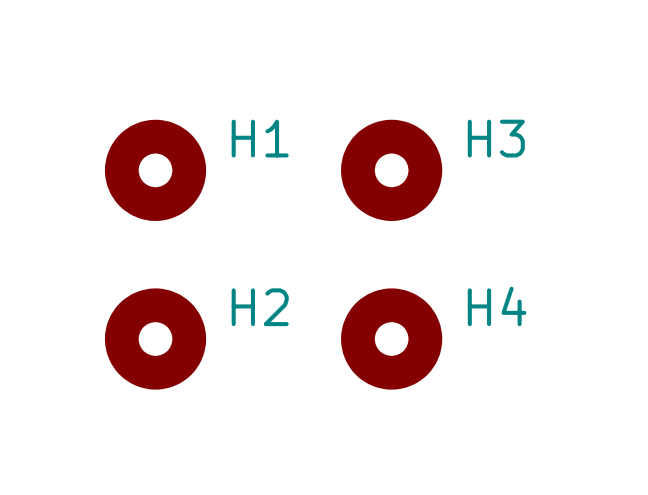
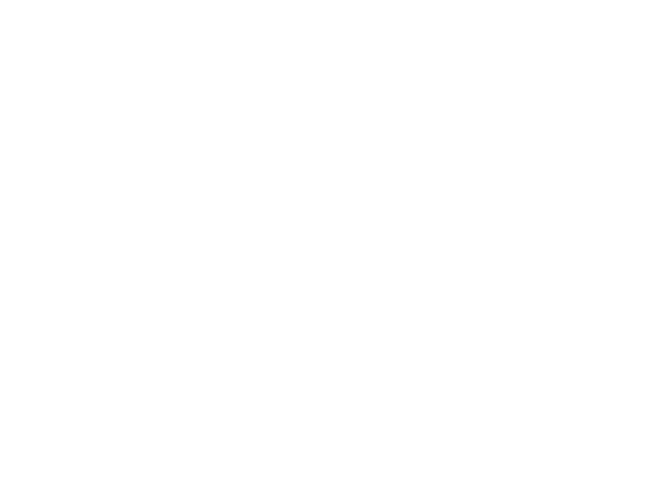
H1: (155, 170) -> none
H3: (391, 170) -> none
H2: (155, 339) -> none
H4: (391, 339) -> none

